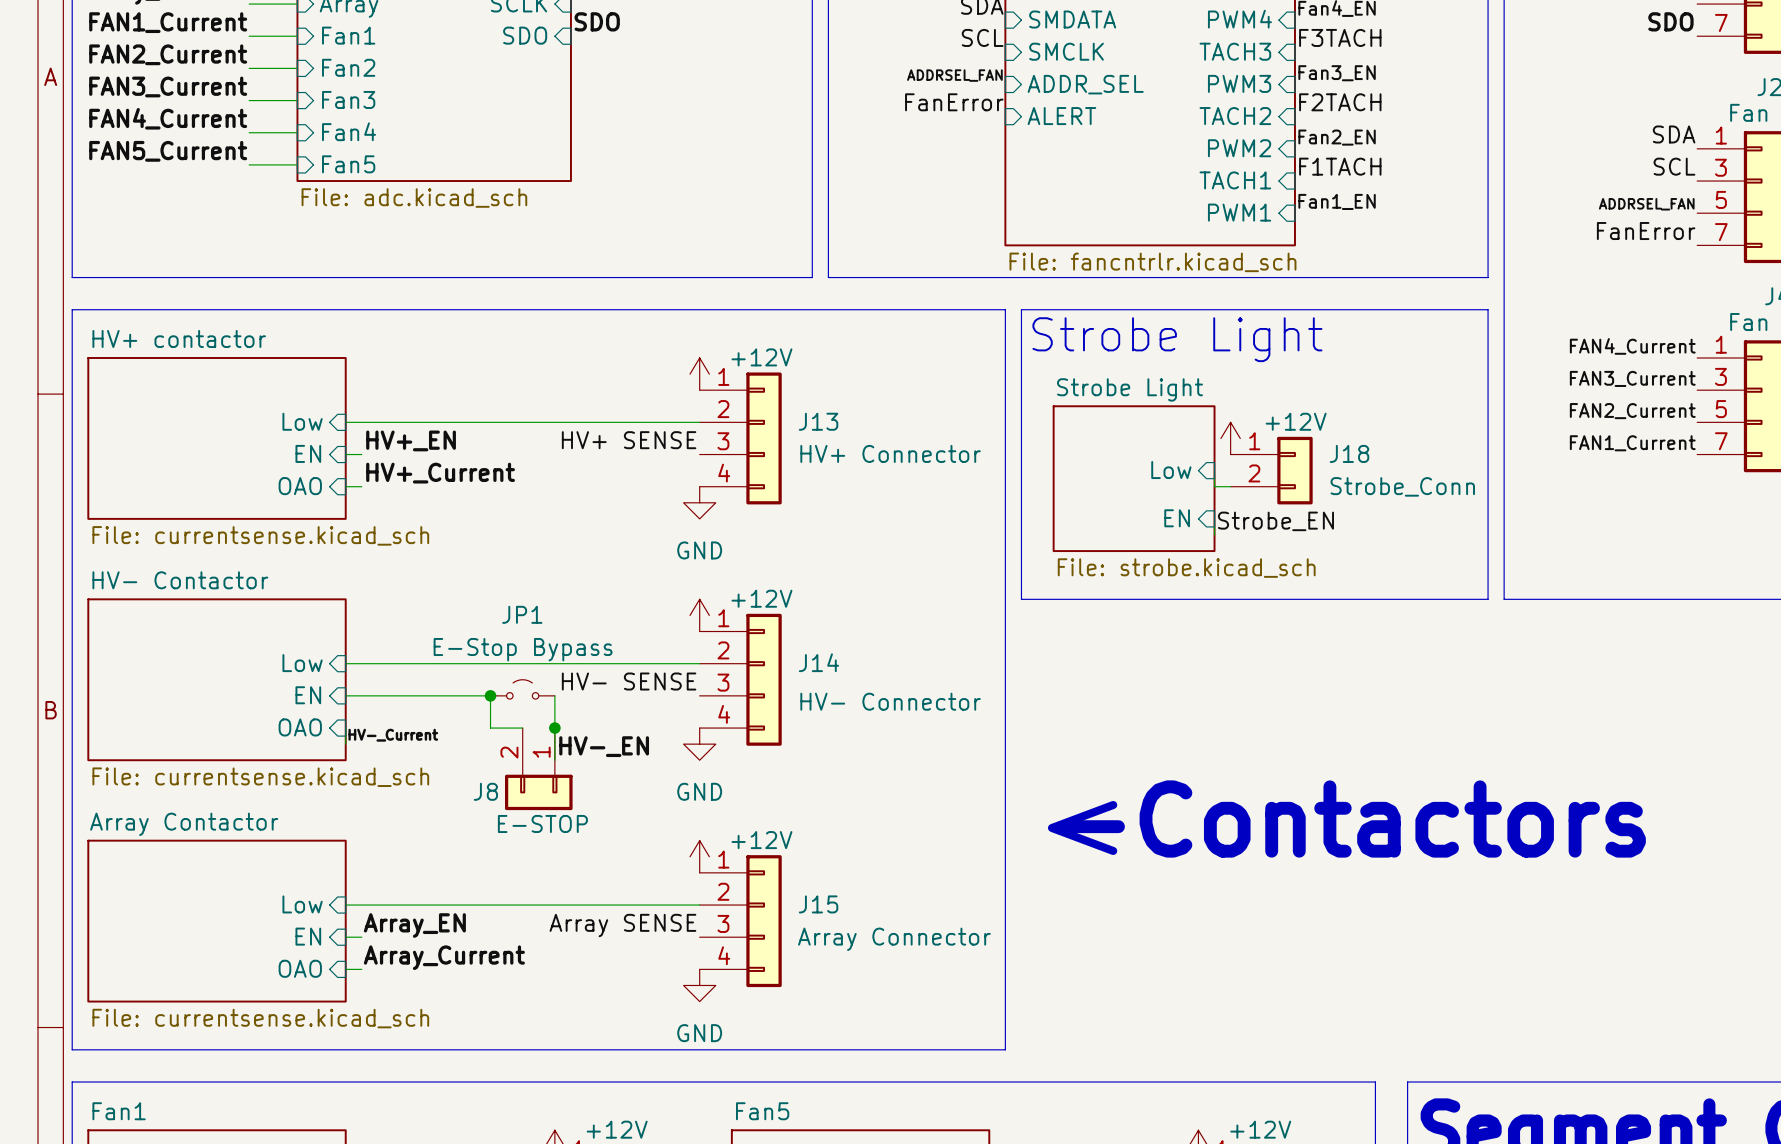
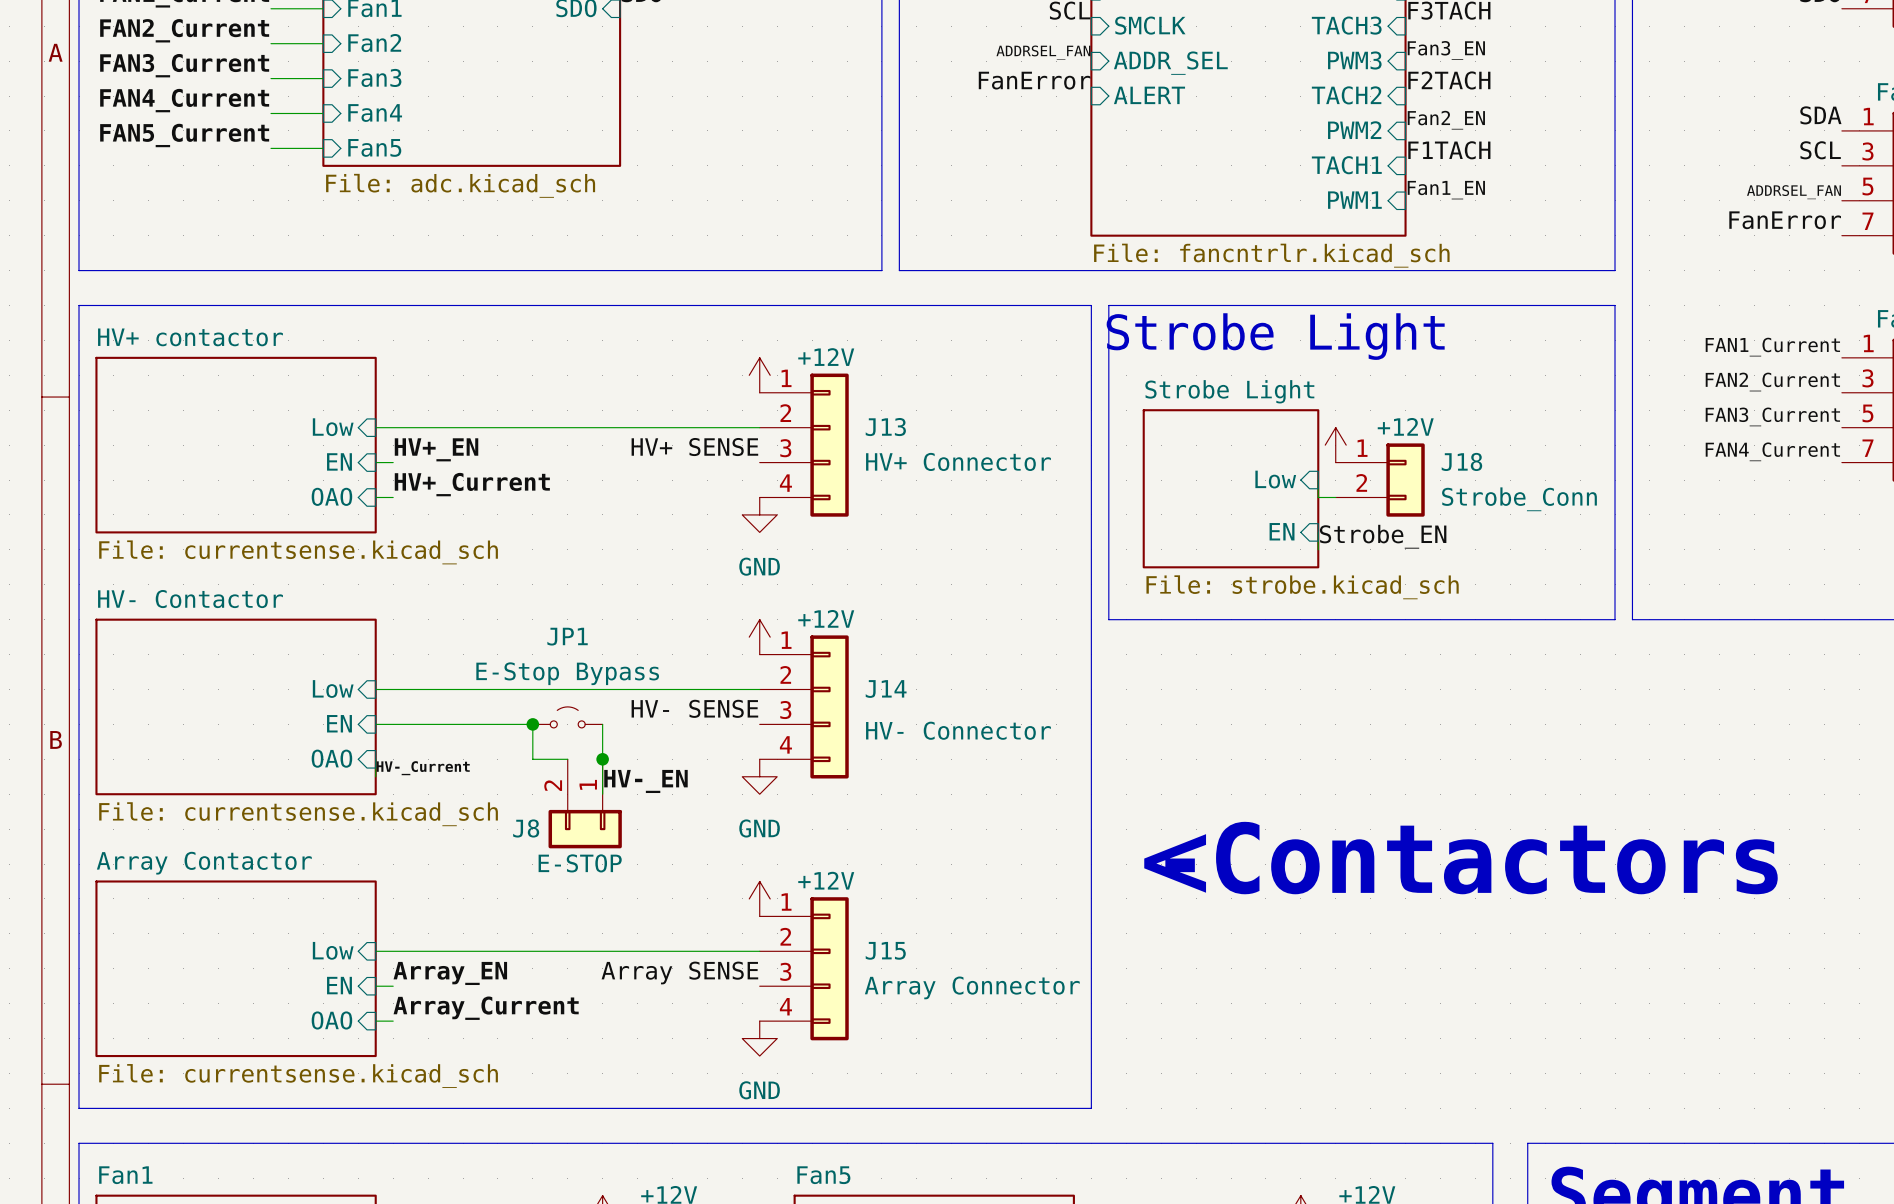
label: FAN4_Current (1632, 346) -> FAN1_Current (1772, 347)
label: FAN3_Current (1632, 378) -> FAN2_Current (1772, 382)
label: FAN2_Current (1632, 411) -> FAN3_Current (1772, 416)
label: FAN1_Current (1632, 443) -> FAN4_Current (1772, 451)

